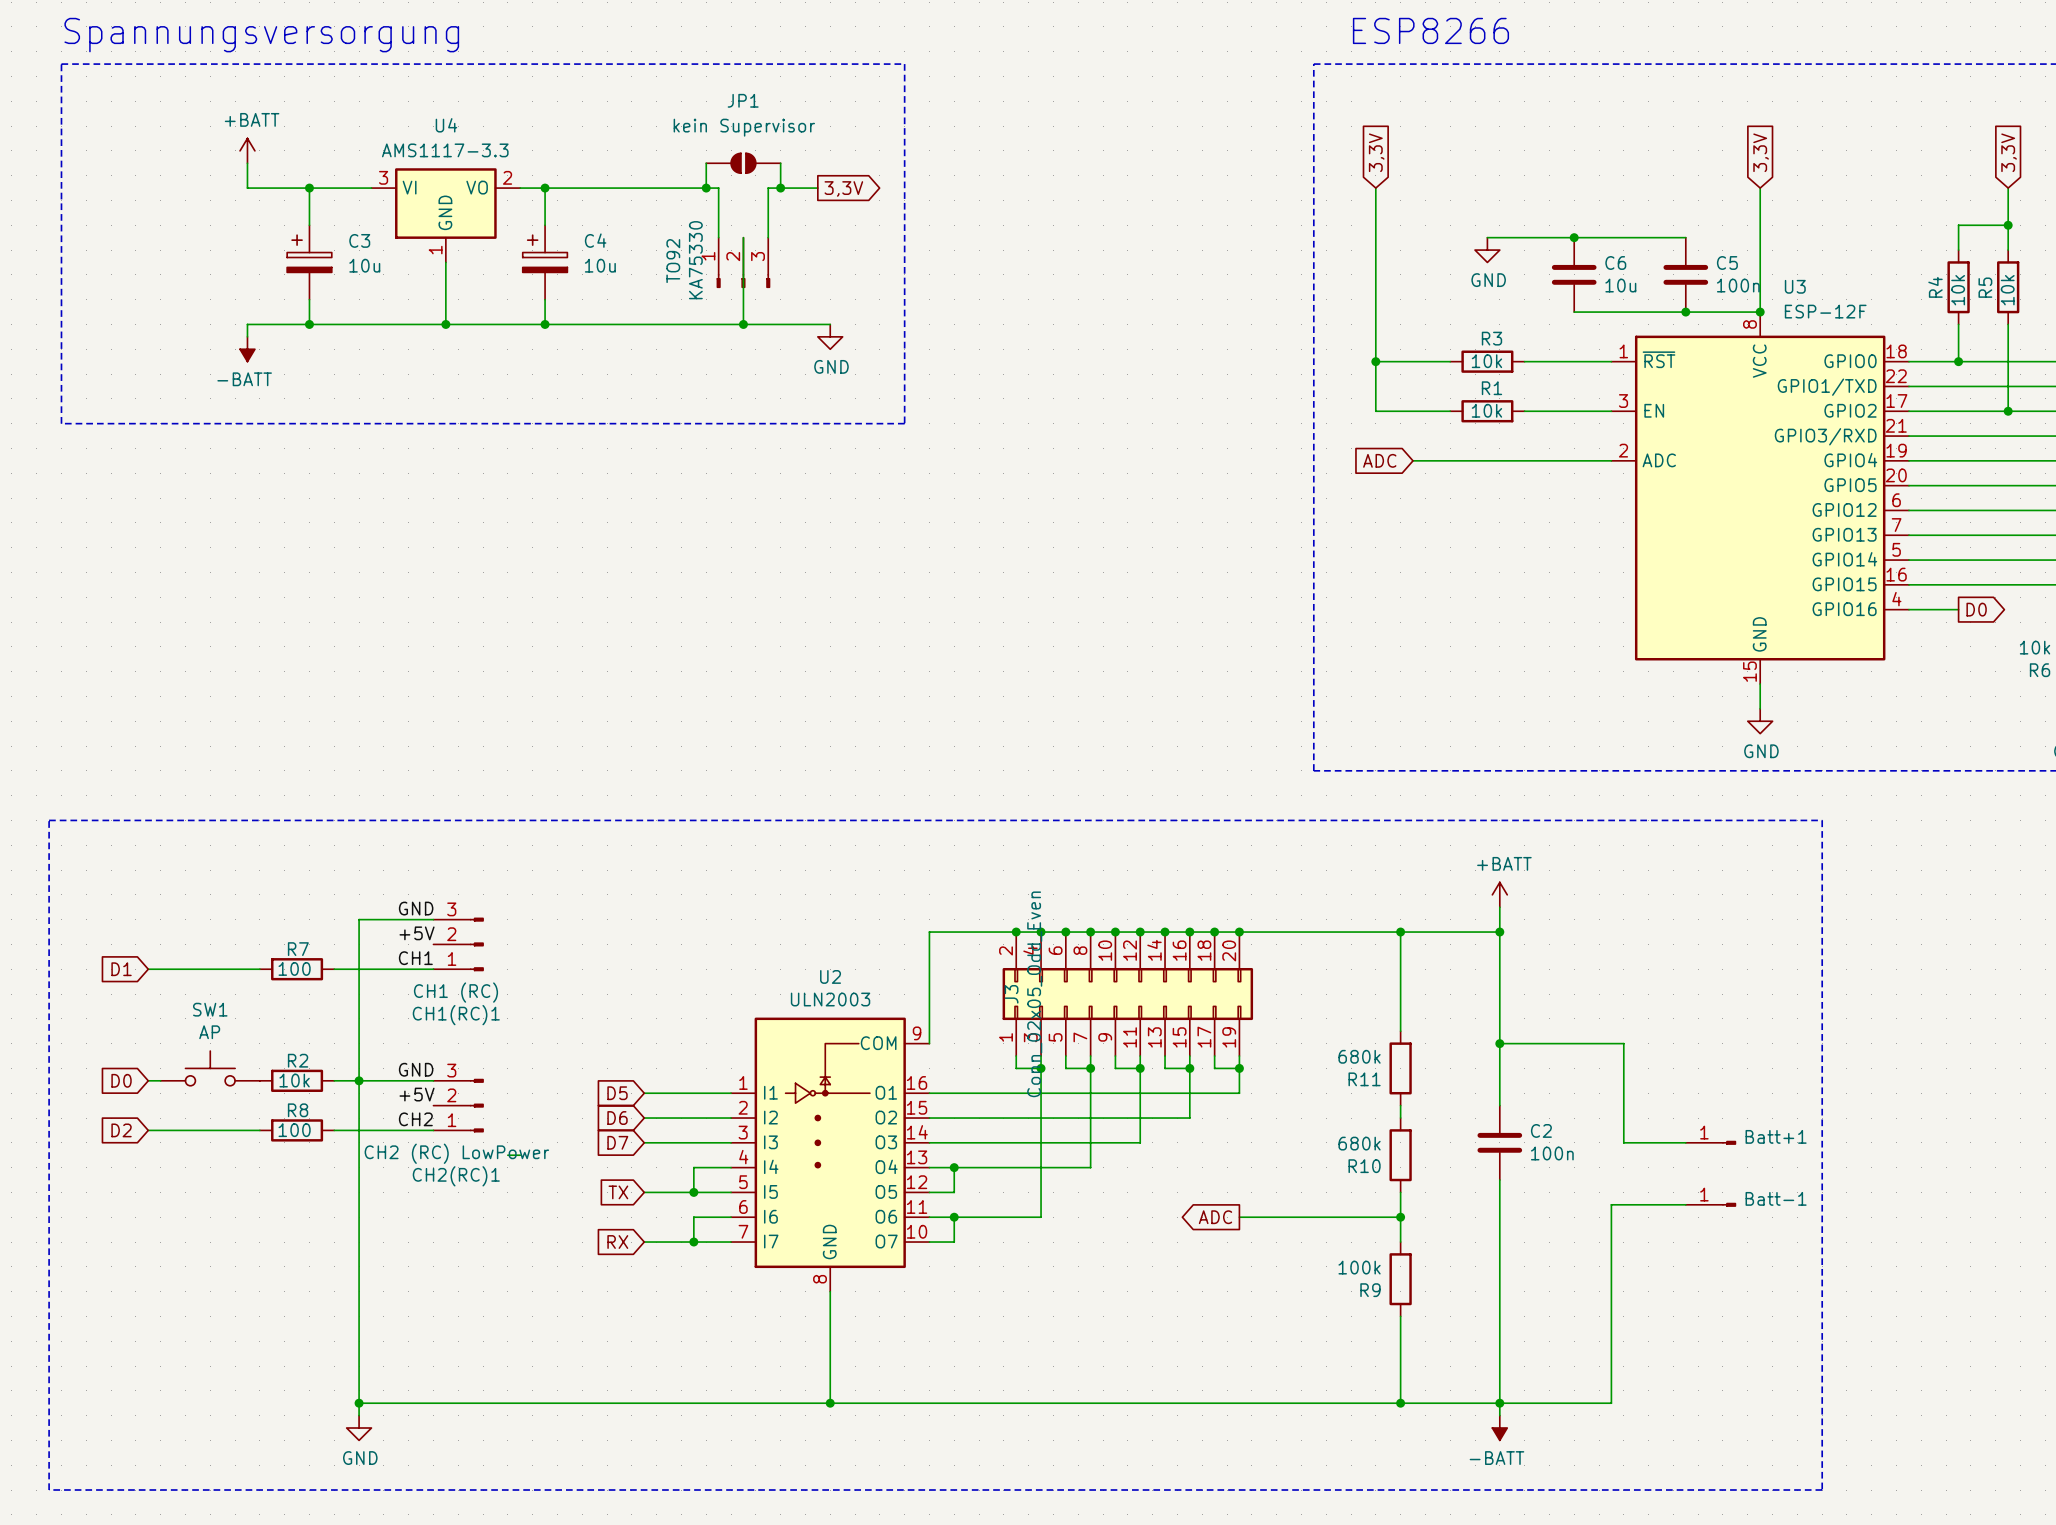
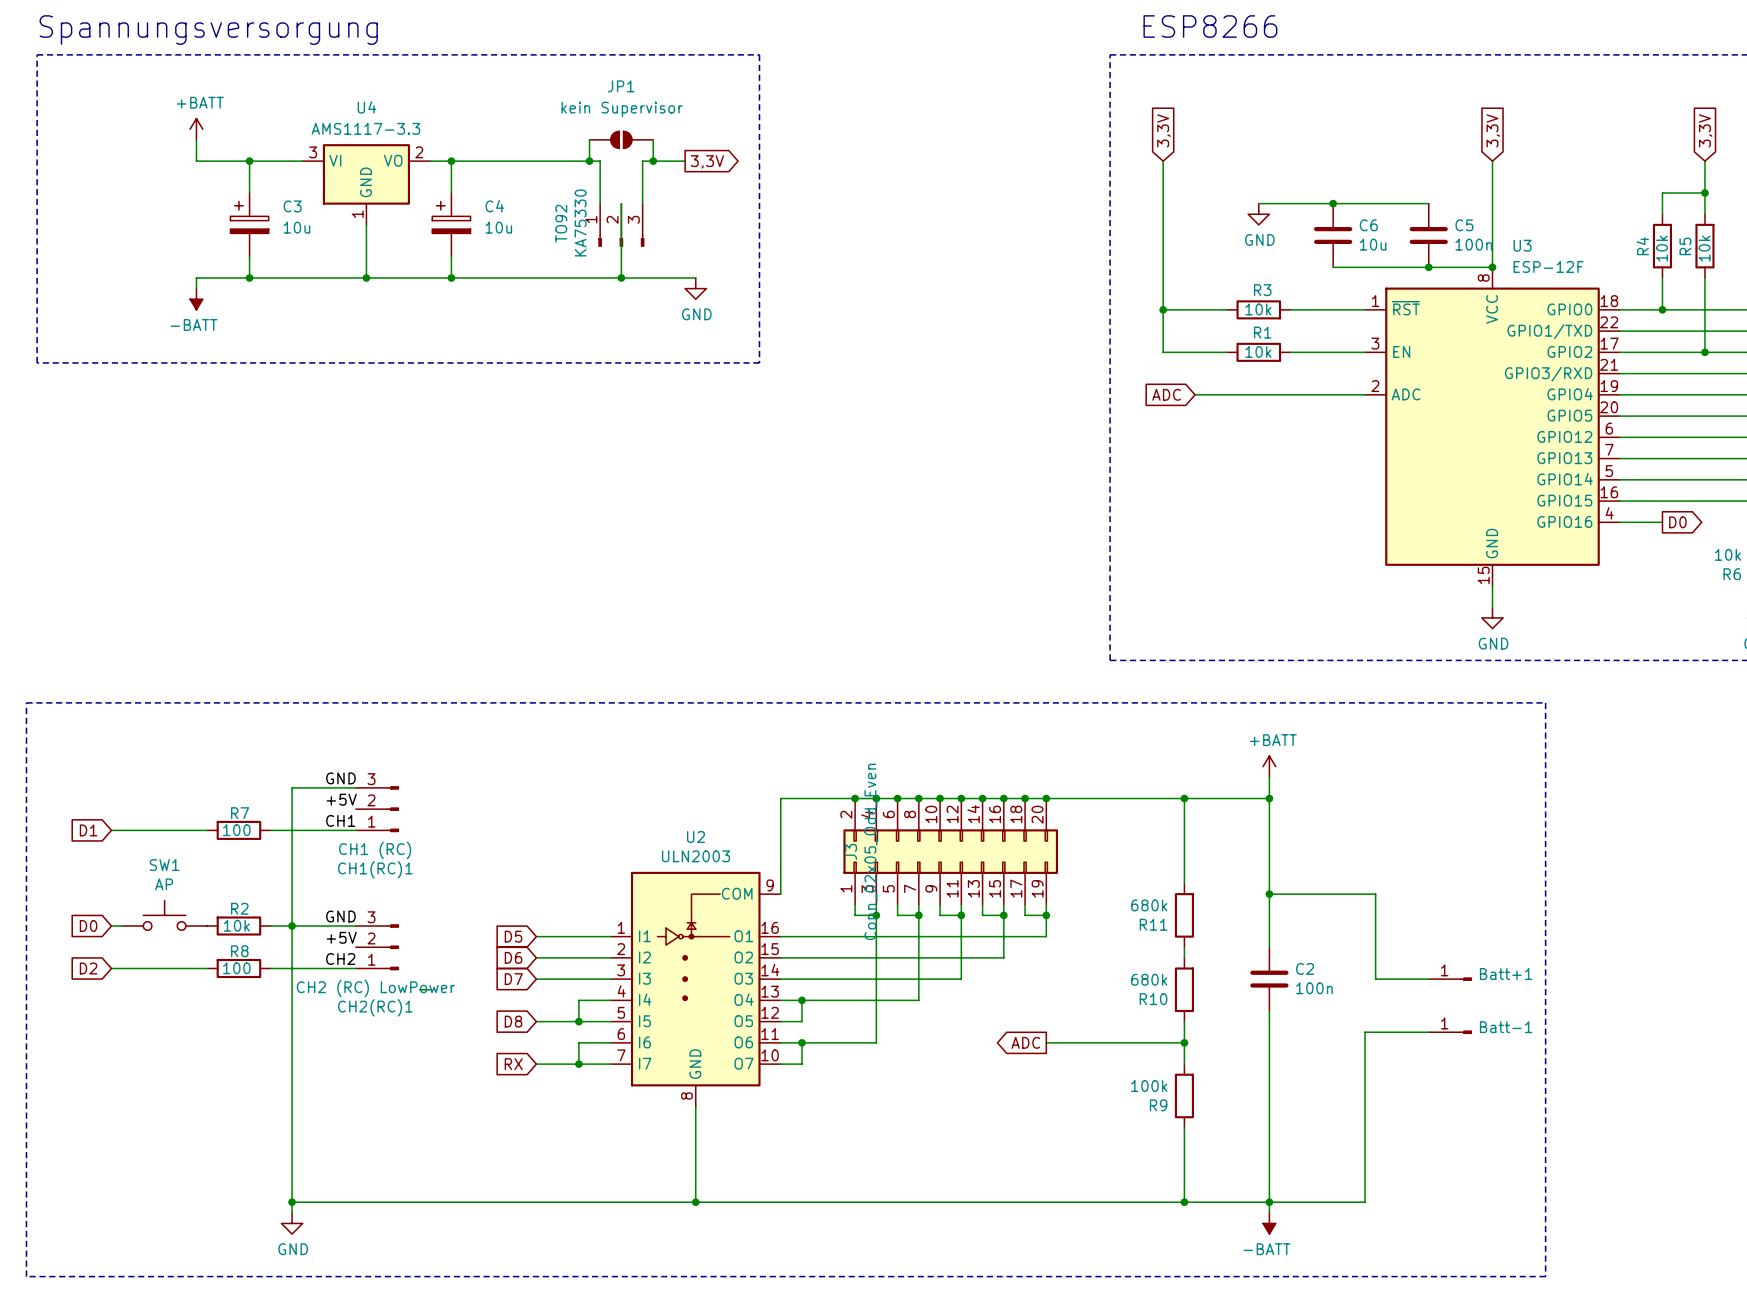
global label: TX (618, 1192) -> D8 (513, 1021)

